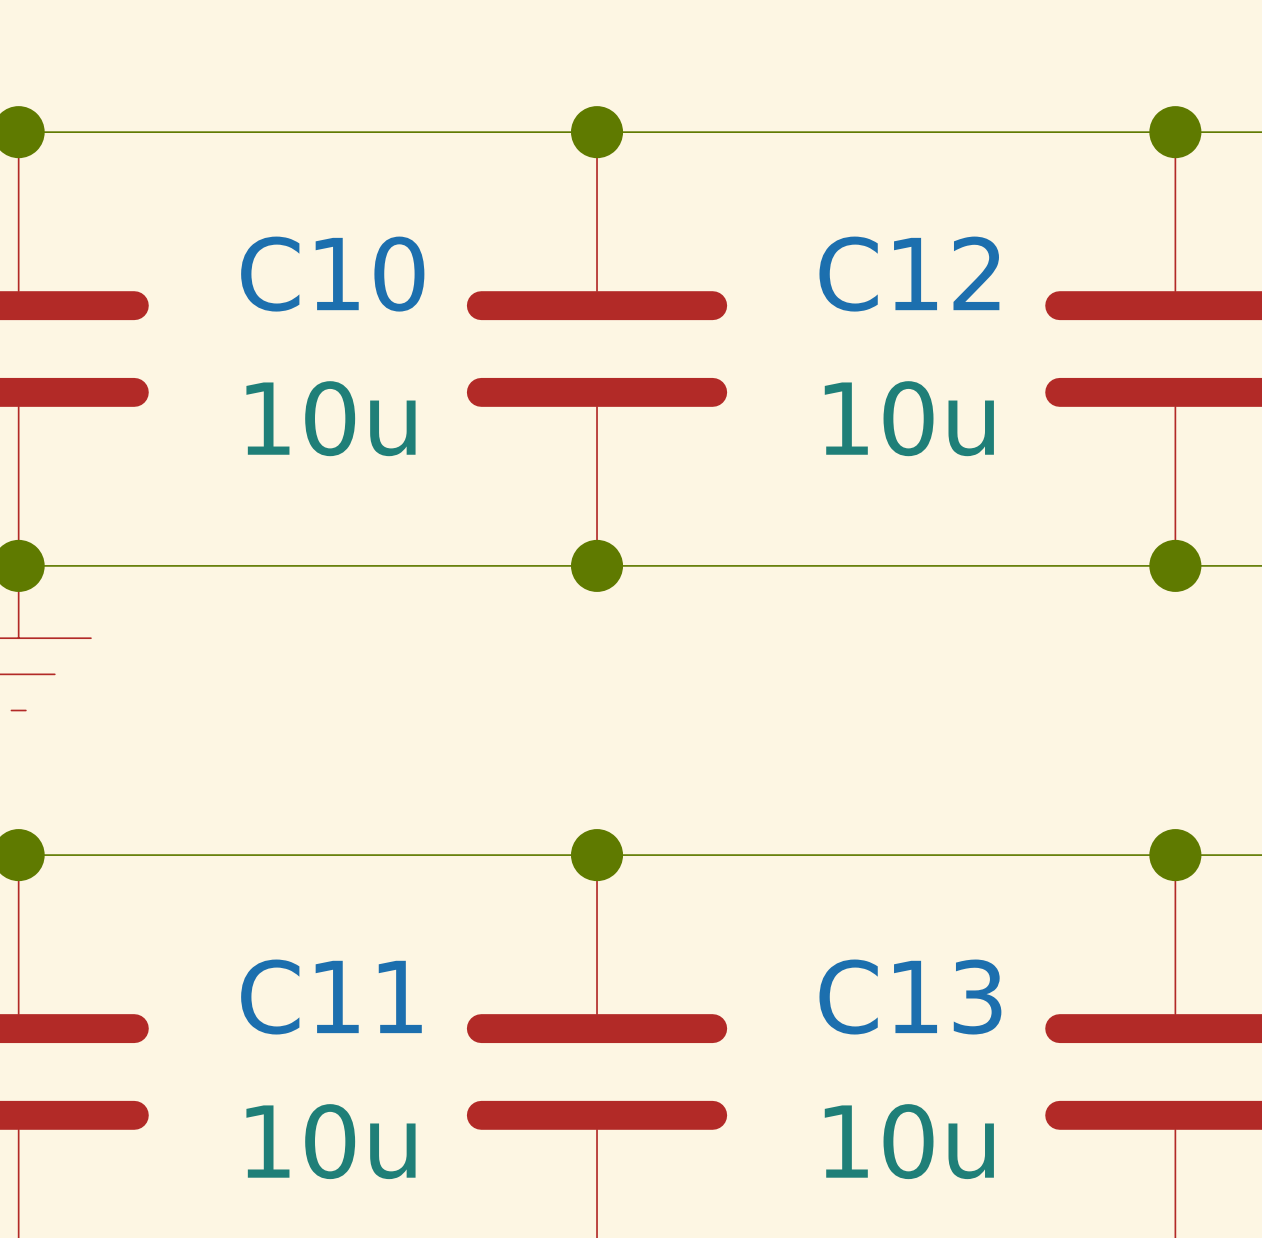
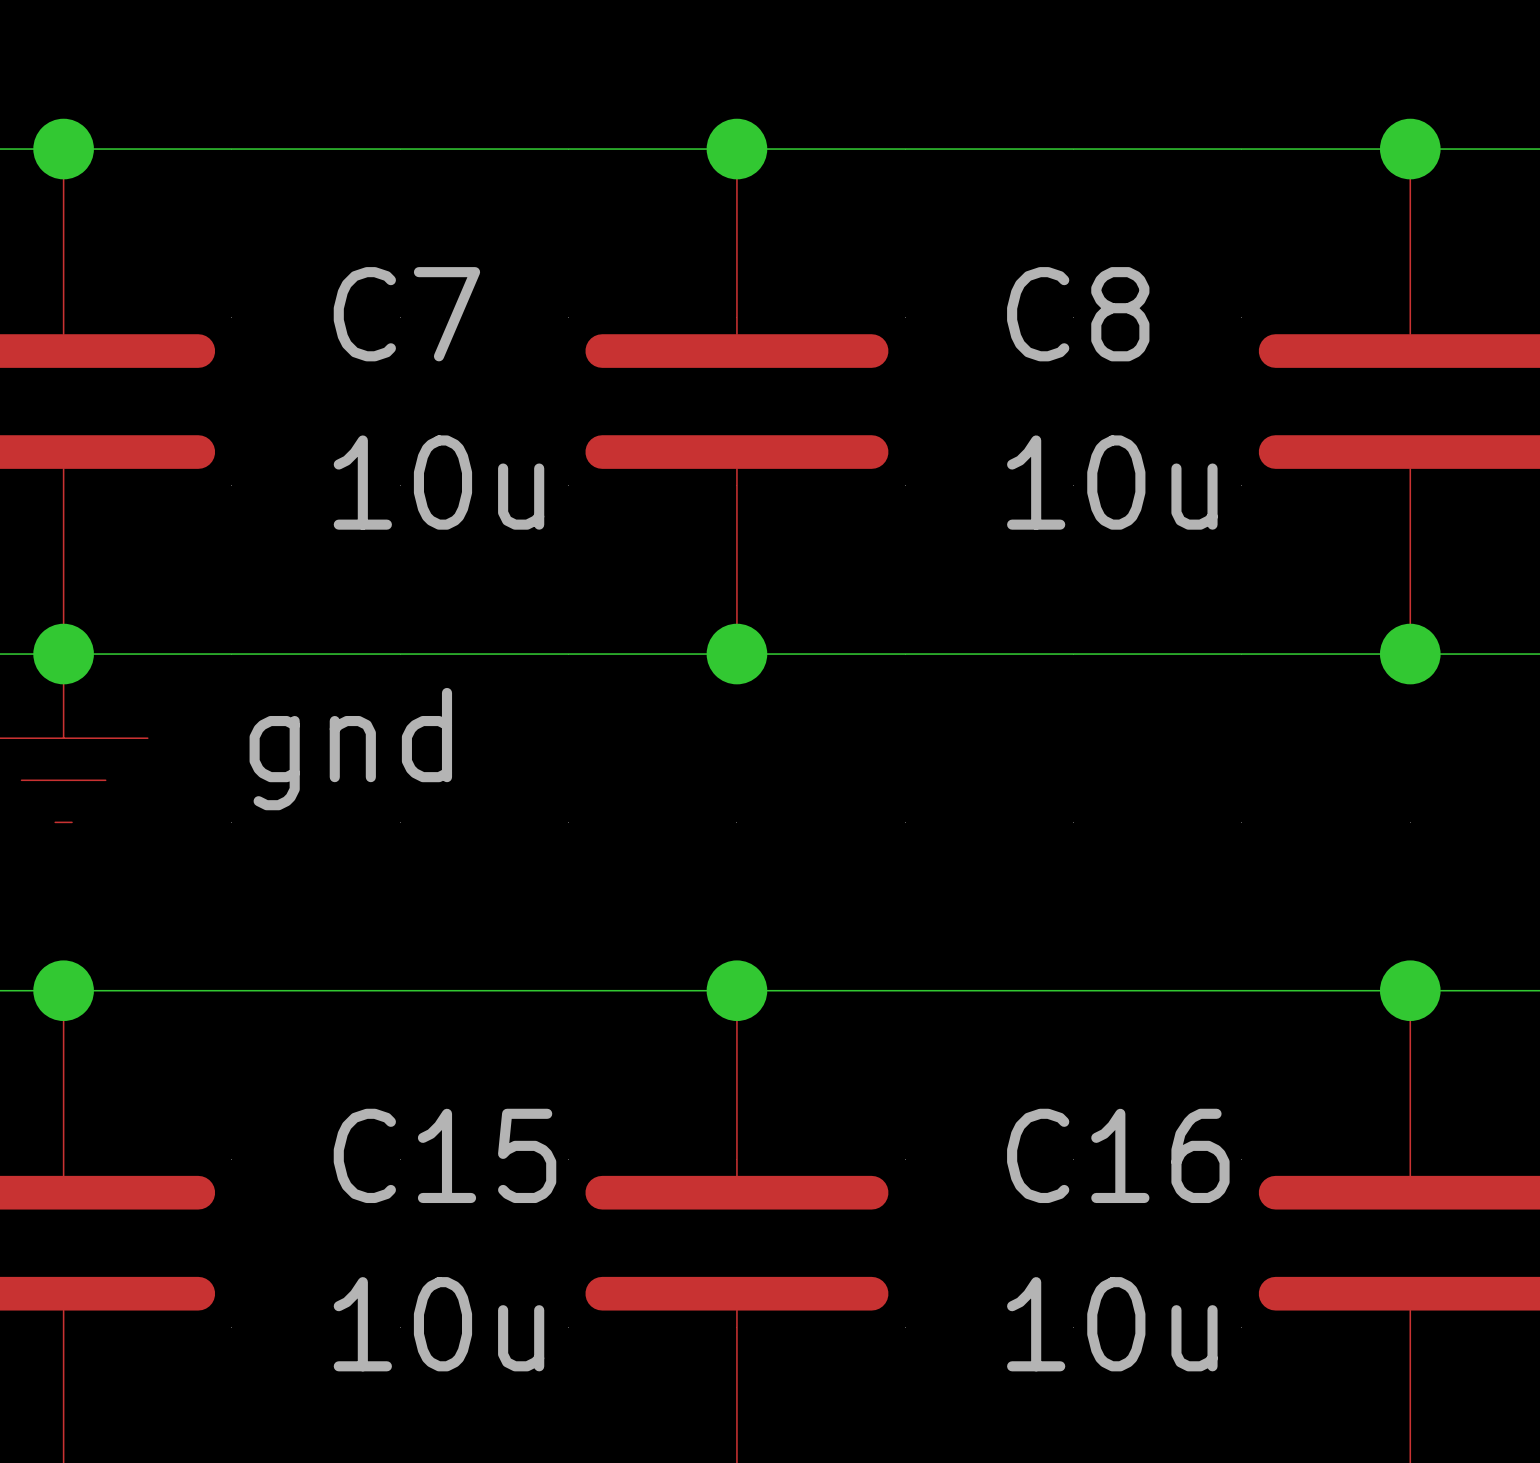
C10 name: C10 (332, 274) -> C7 (406, 314)
C12 name: C12 (909, 274) -> C8 (1078, 314)
power symbol text: none -> gnd (350, 749)
C11 name: C11 (331, 997) -> C15 (445, 1155)
C13 name: C13 (910, 997) -> C16 (1118, 1155)

